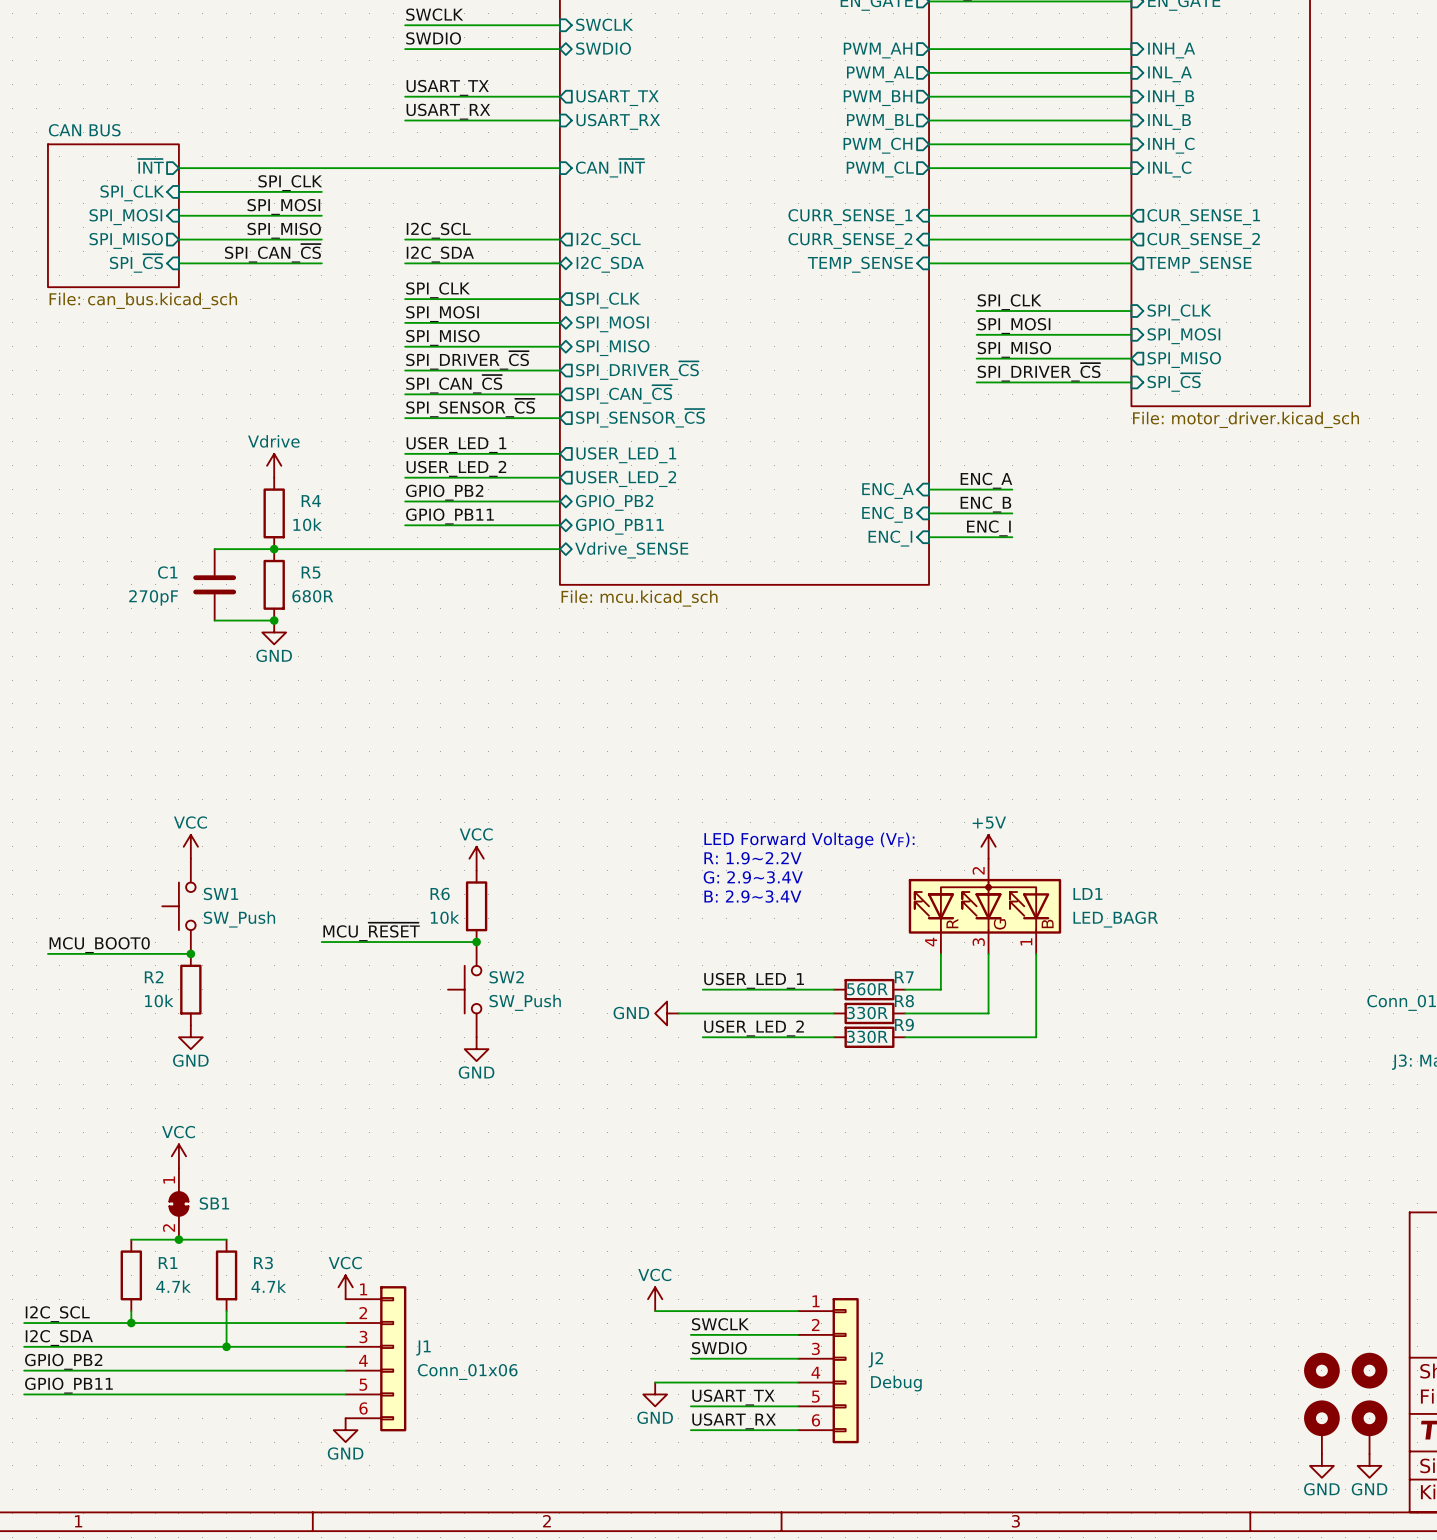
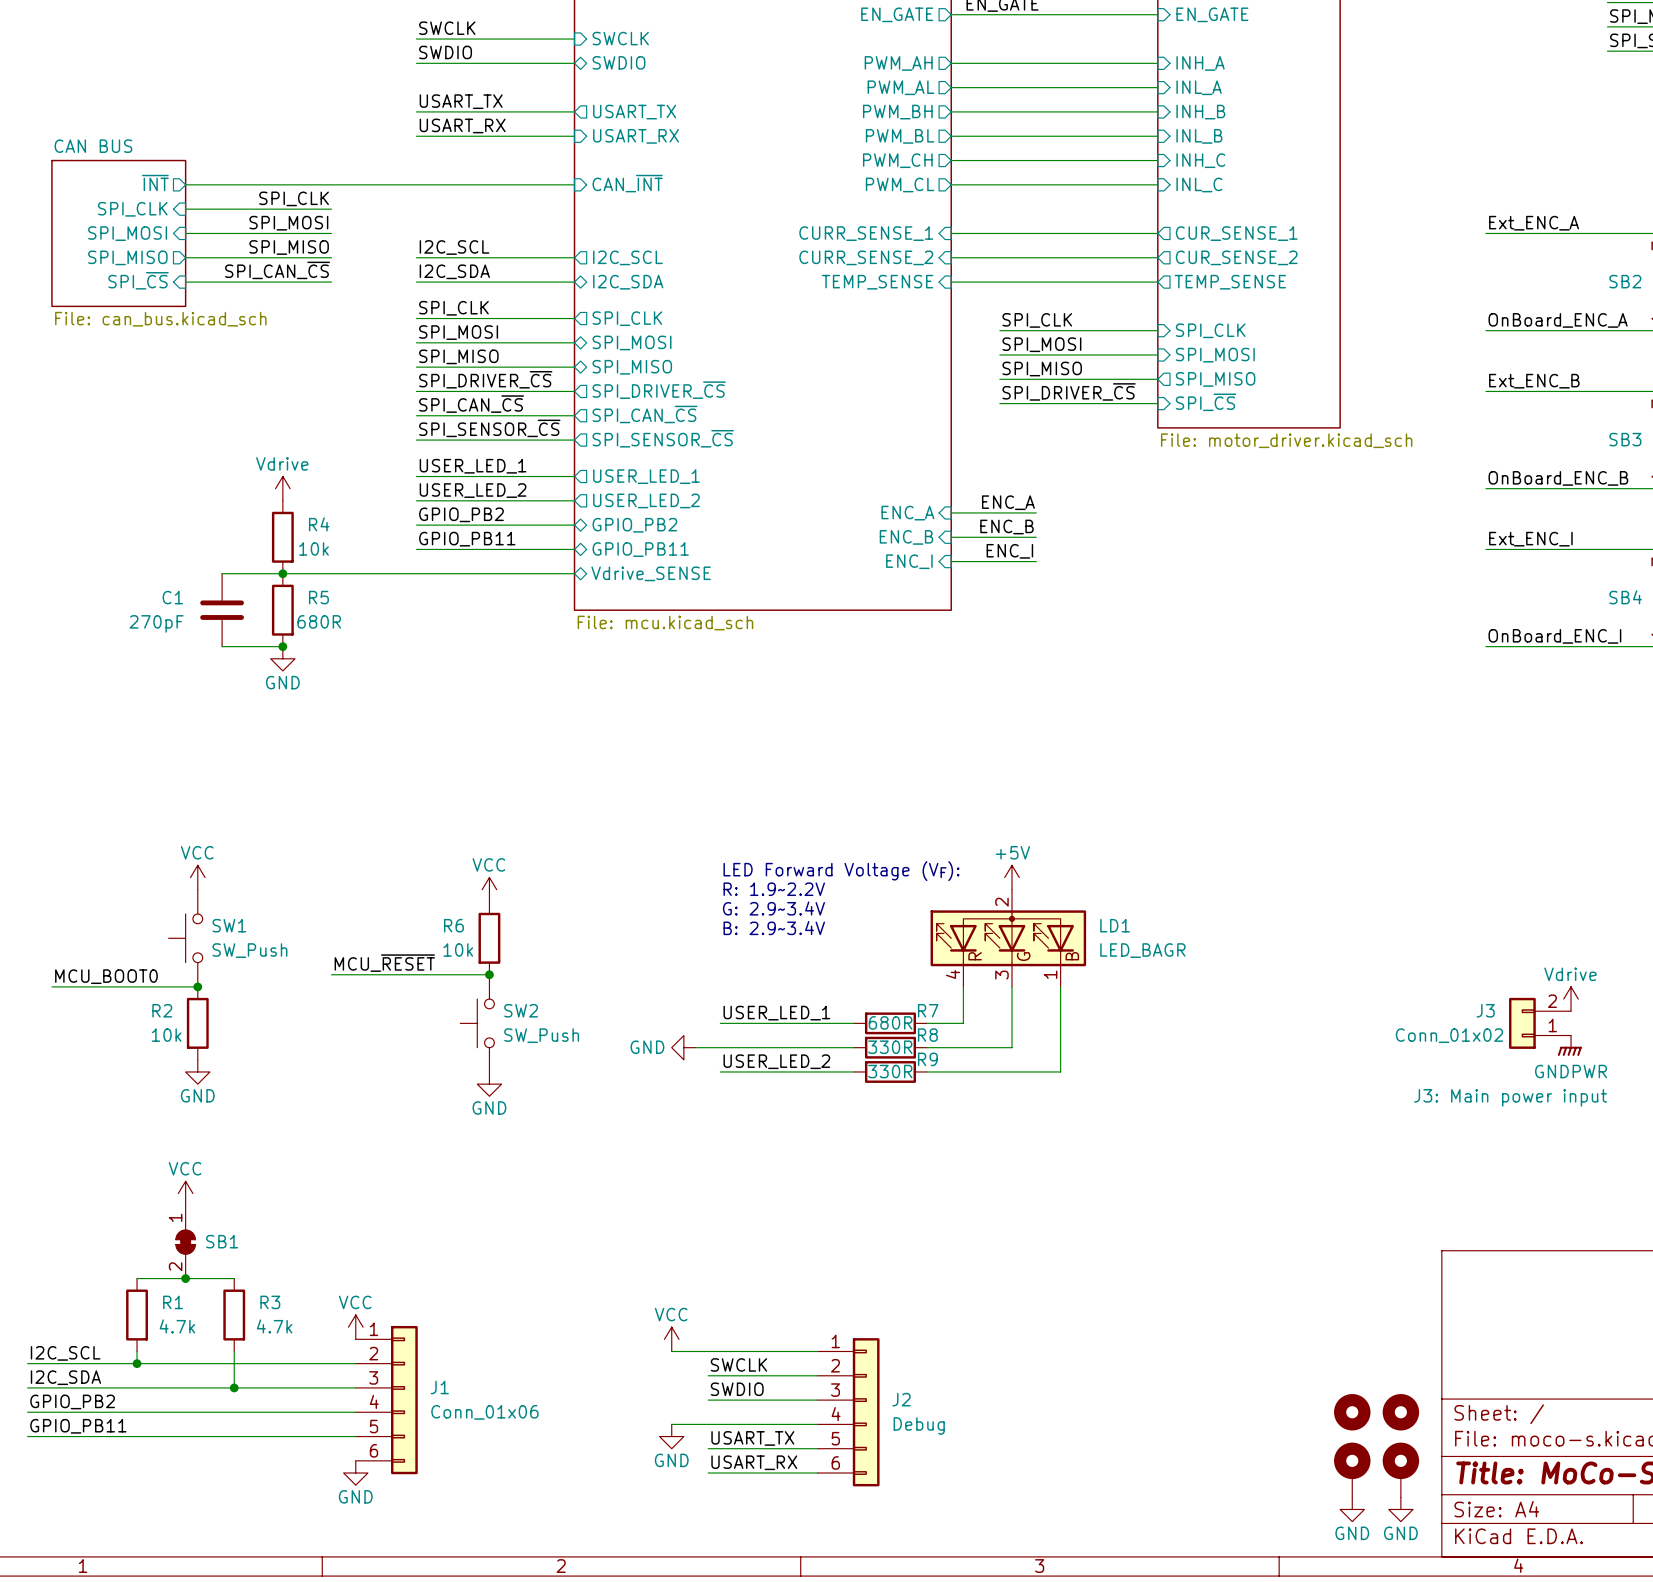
R7 value: 560R (867, 989) -> 680R (890, 1022)

